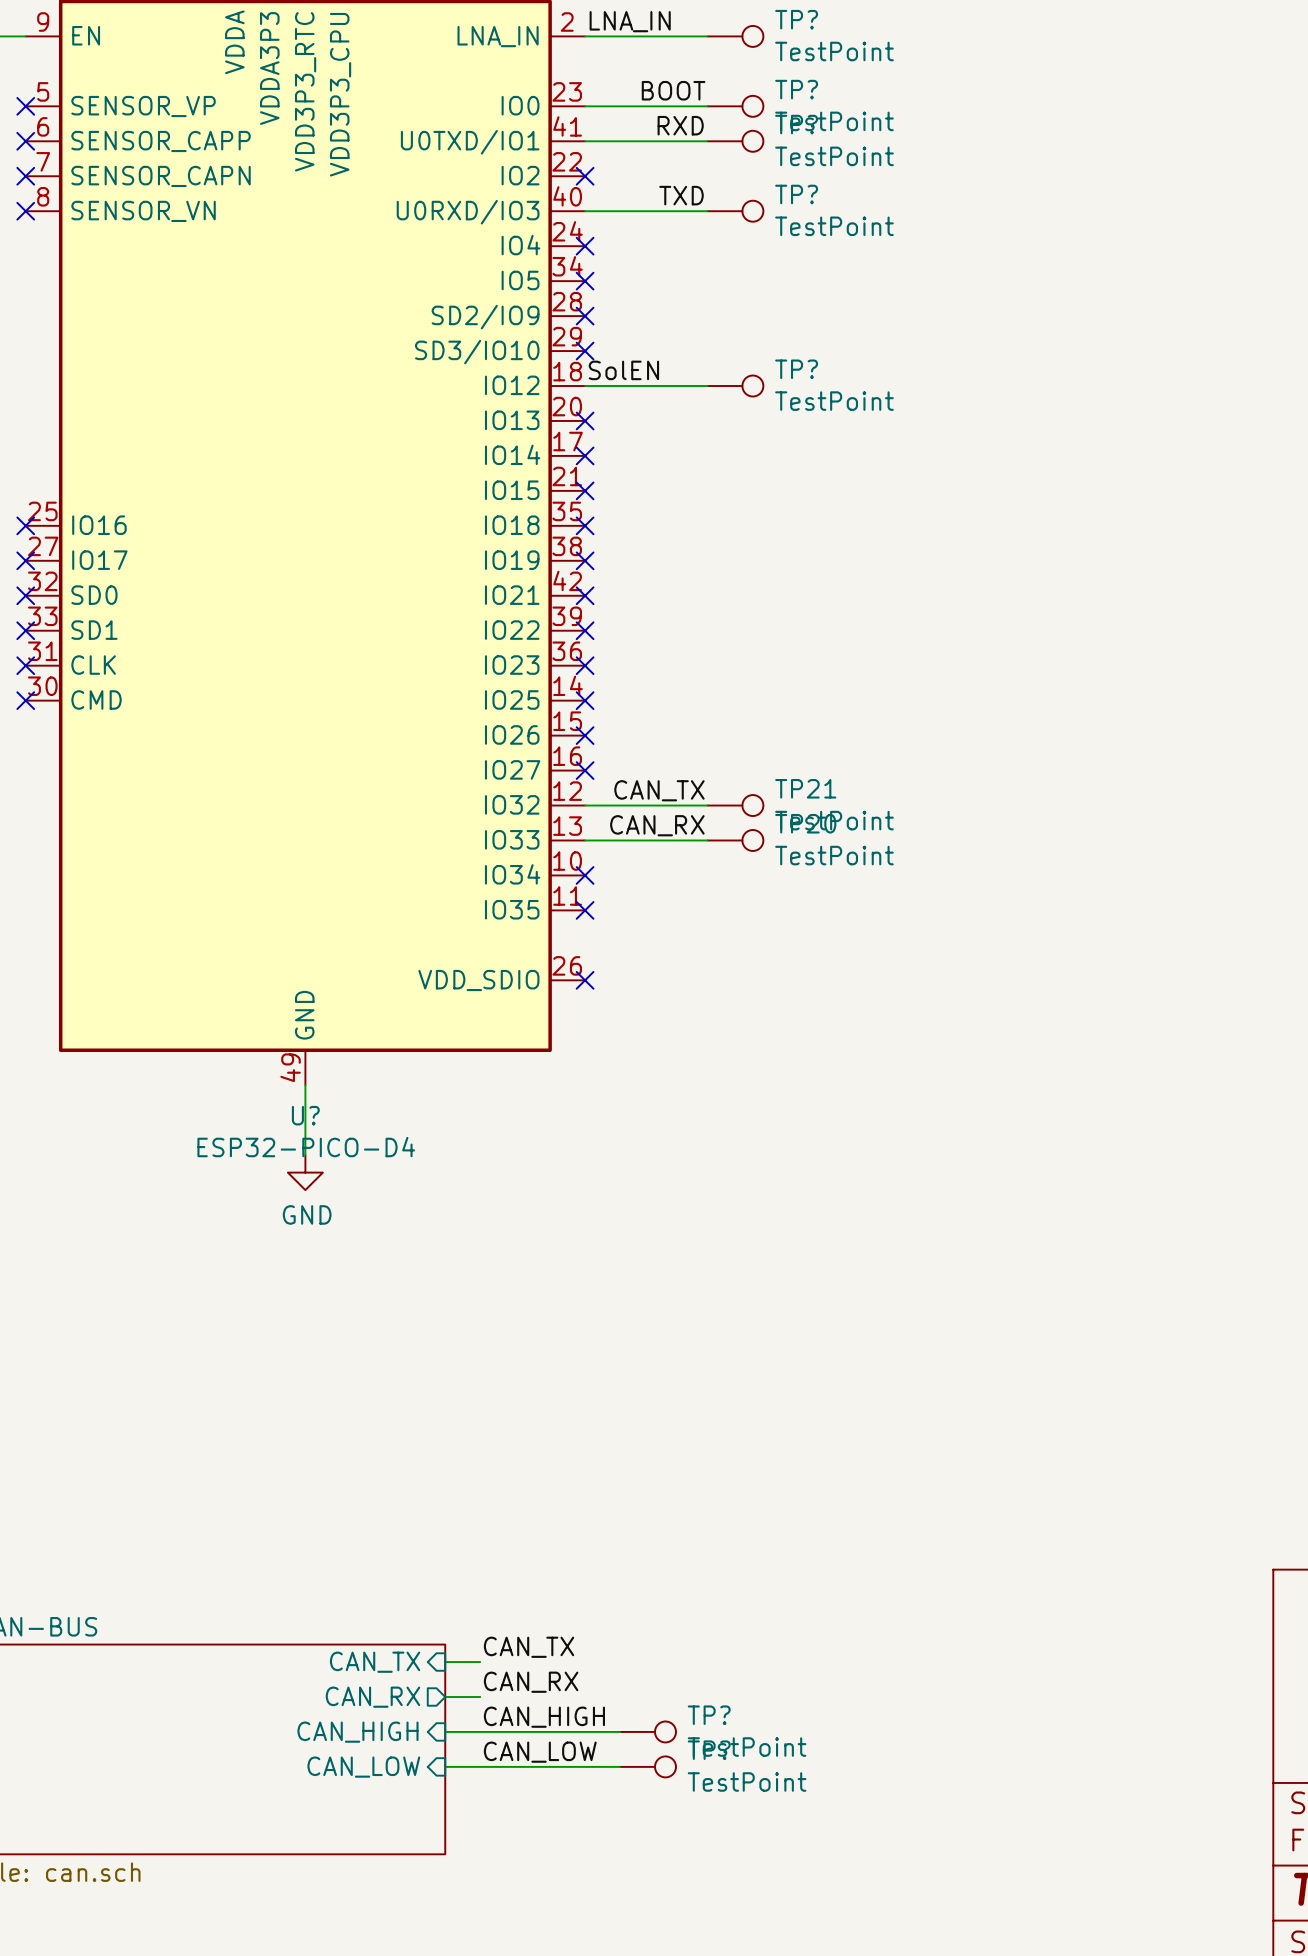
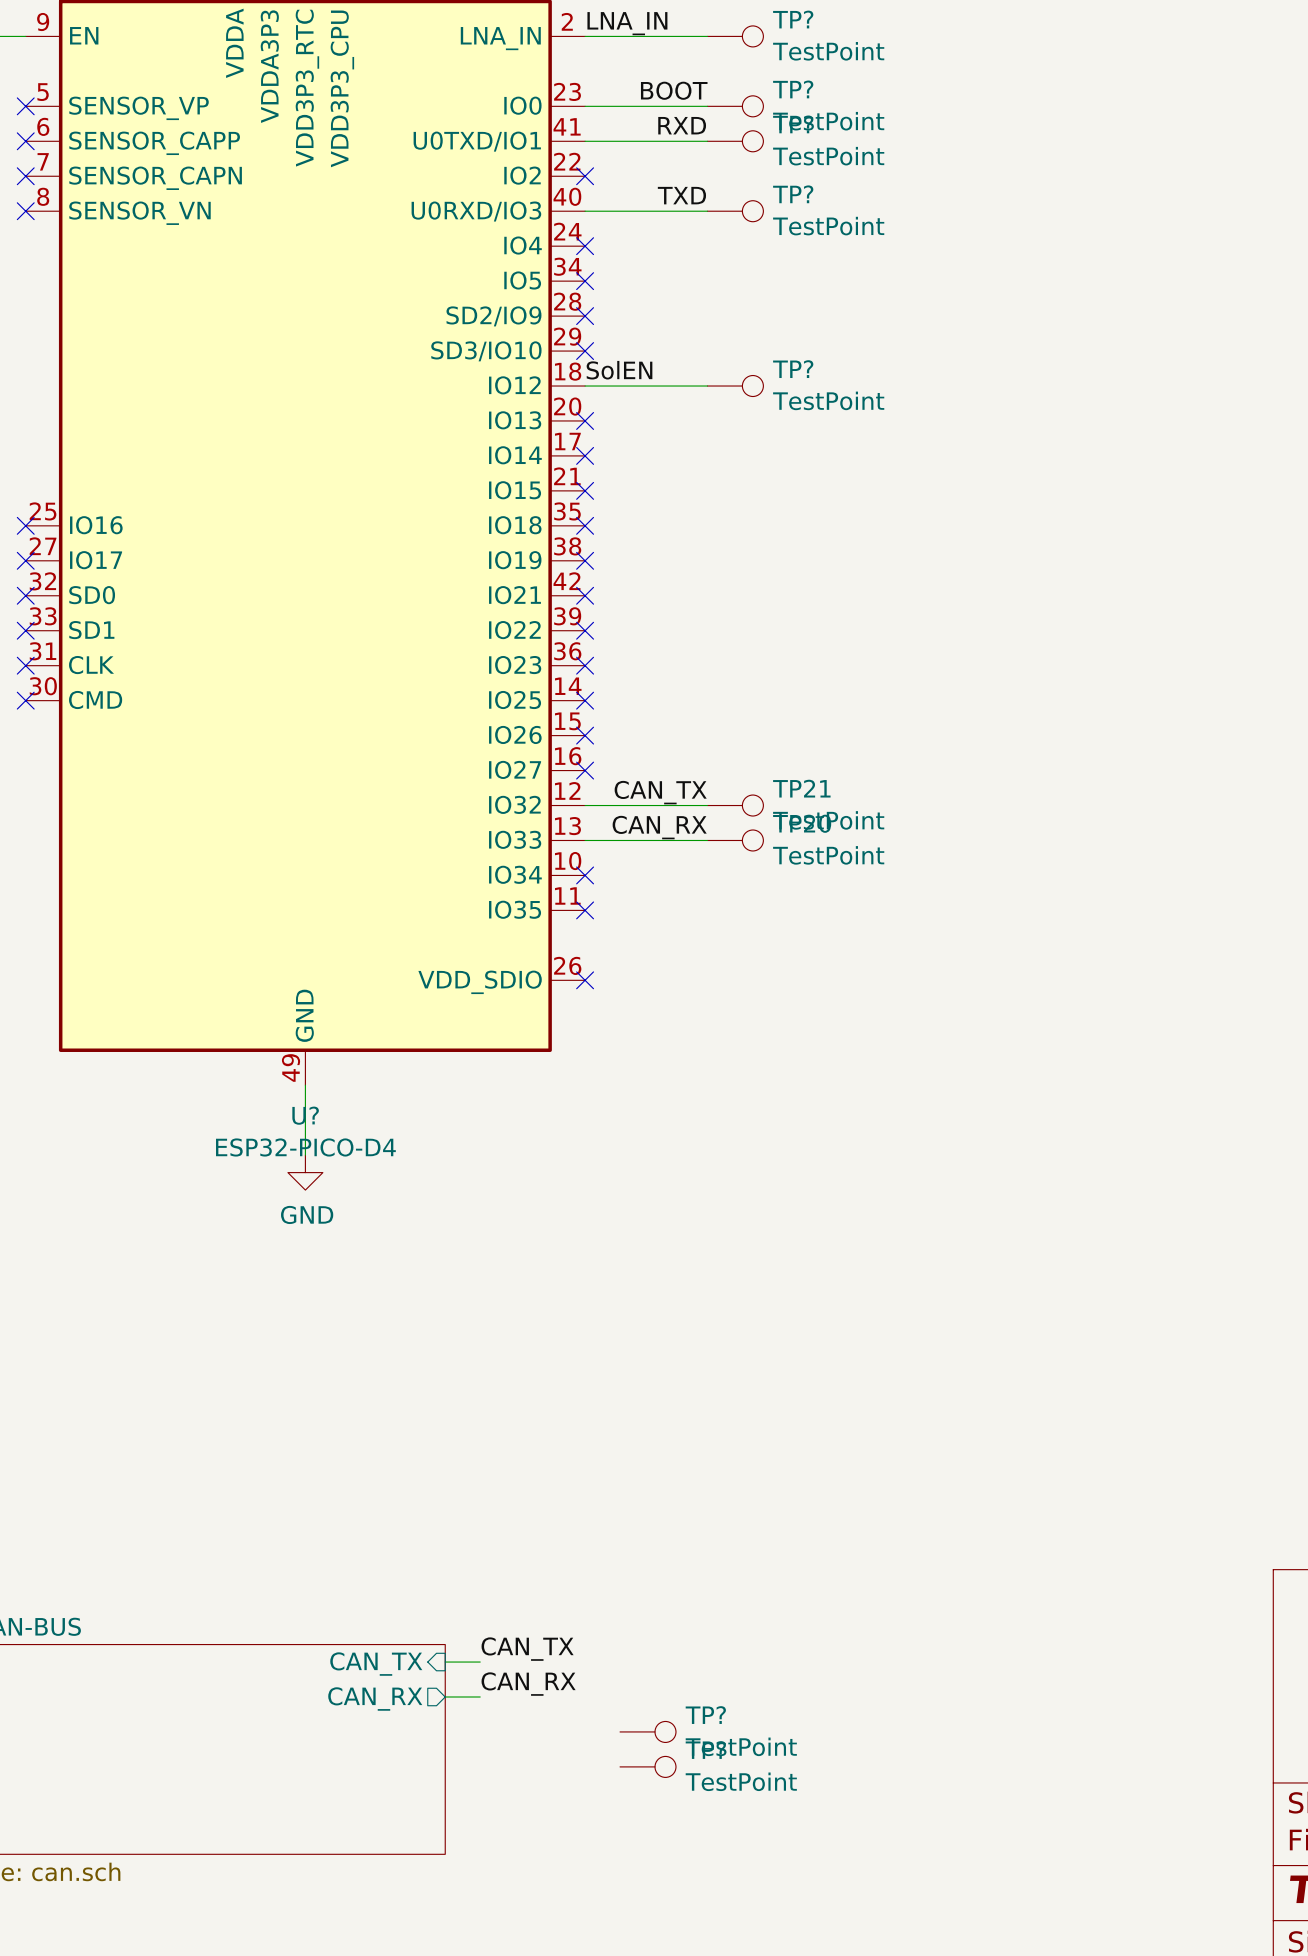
label: CAN_HIGH (544, 1717) -> none
wire: (445, 1731) (620, 1731) -> none
sheet pin: CAN_HIGH (357, 1732) -> none
label: CAN_LOW (540, 1752) -> none
wire: (445, 1766) (620, 1766) -> none
sheet pin: CAN_LOW (363, 1767) -> none

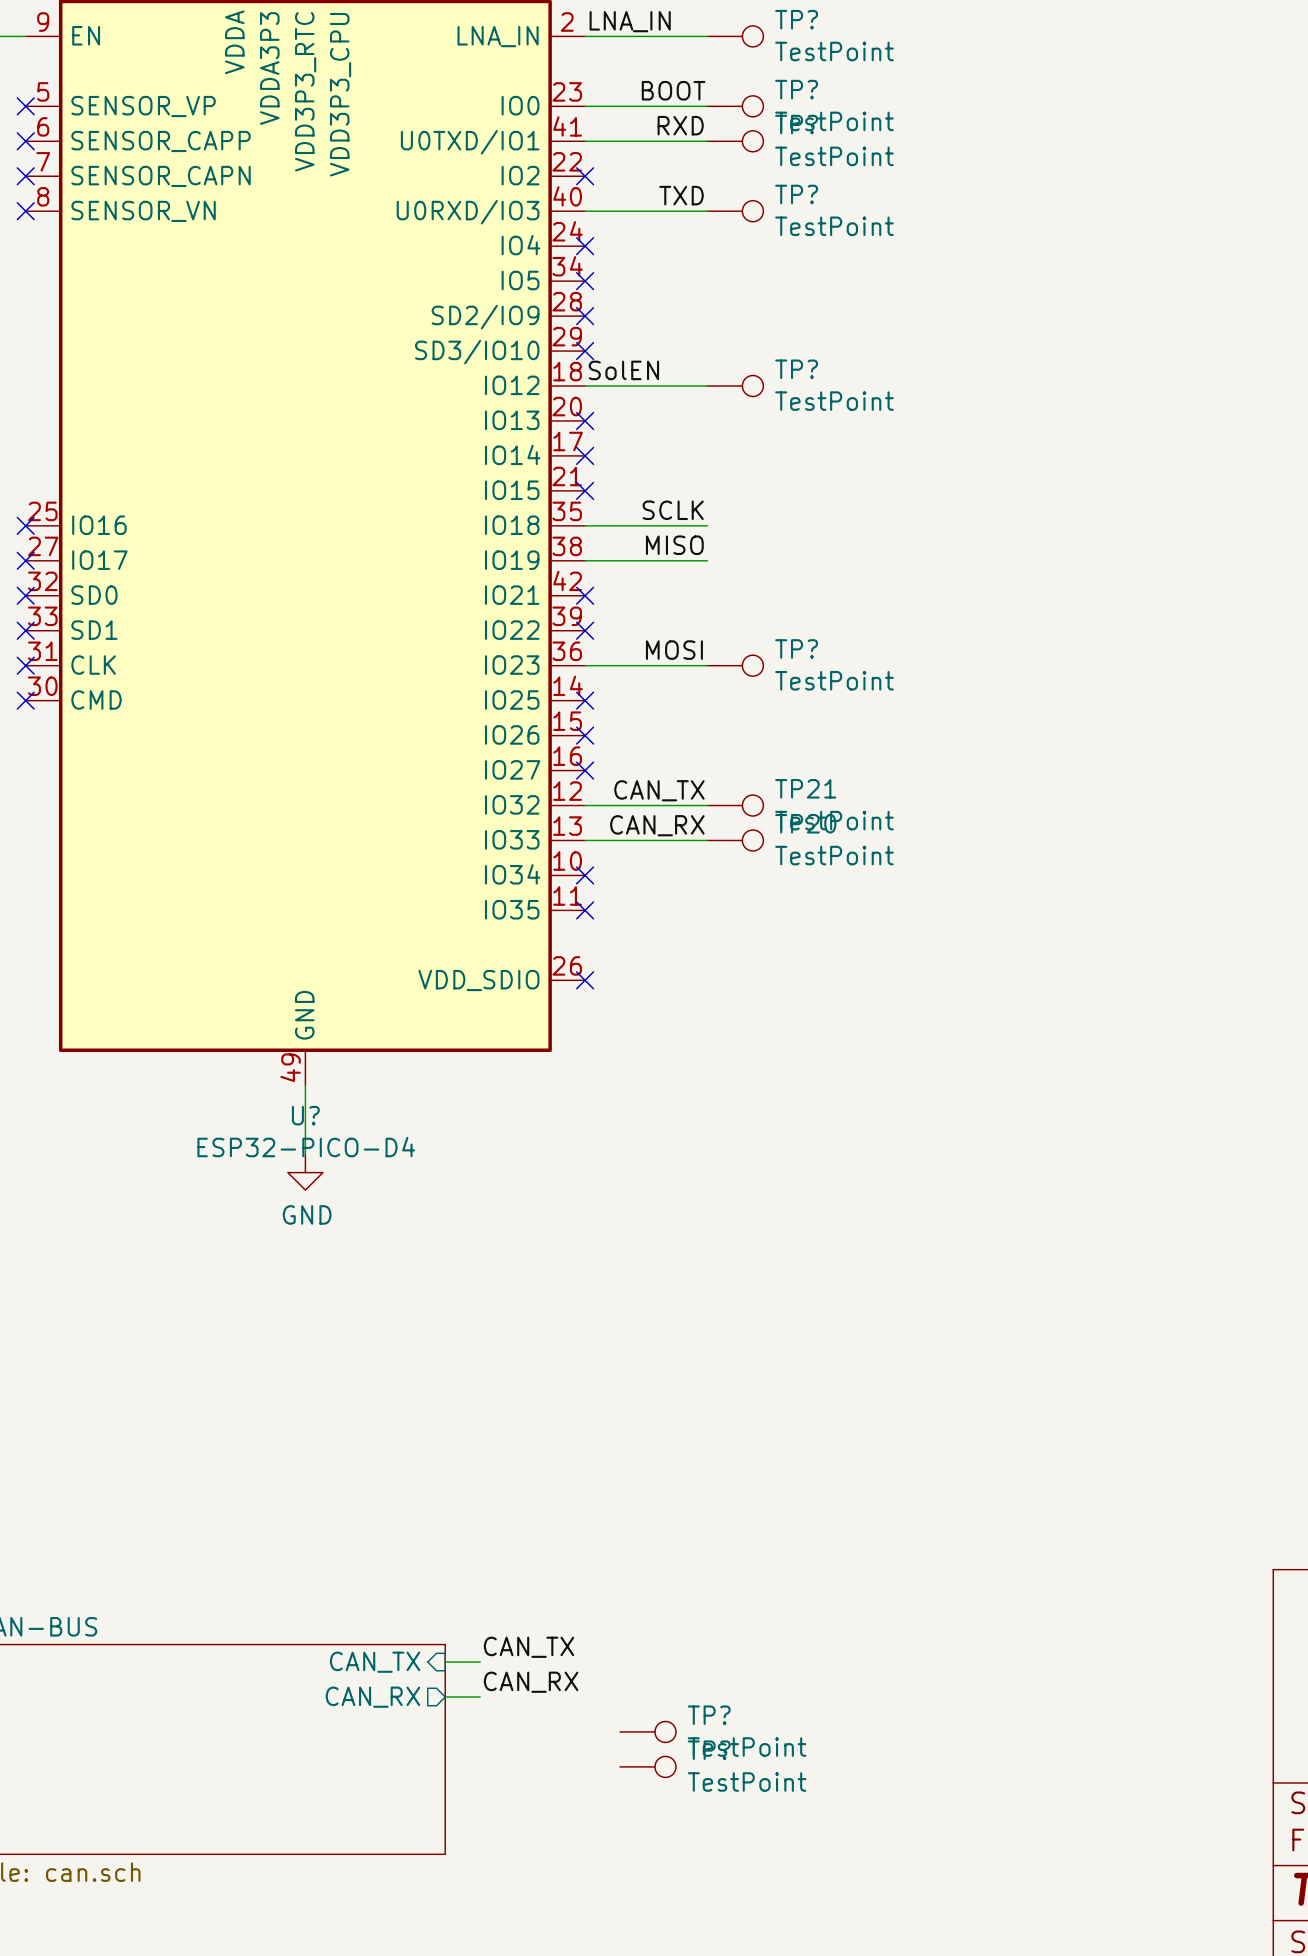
label: none -> SCLK (673, 510)
wire: none -> (585, 525) (707, 525)
no-connect mark: (585, 525) -> none
label: none -> MISO (674, 545)
wire: none -> (585, 560) (707, 560)
no-connect mark: (585, 560) -> none
label: none -> MOSI (674, 650)
wire: none -> (585, 665) (707, 665)
no-connect mark: (585, 665) -> none
TP?: none -> TestPoint (735, 665)

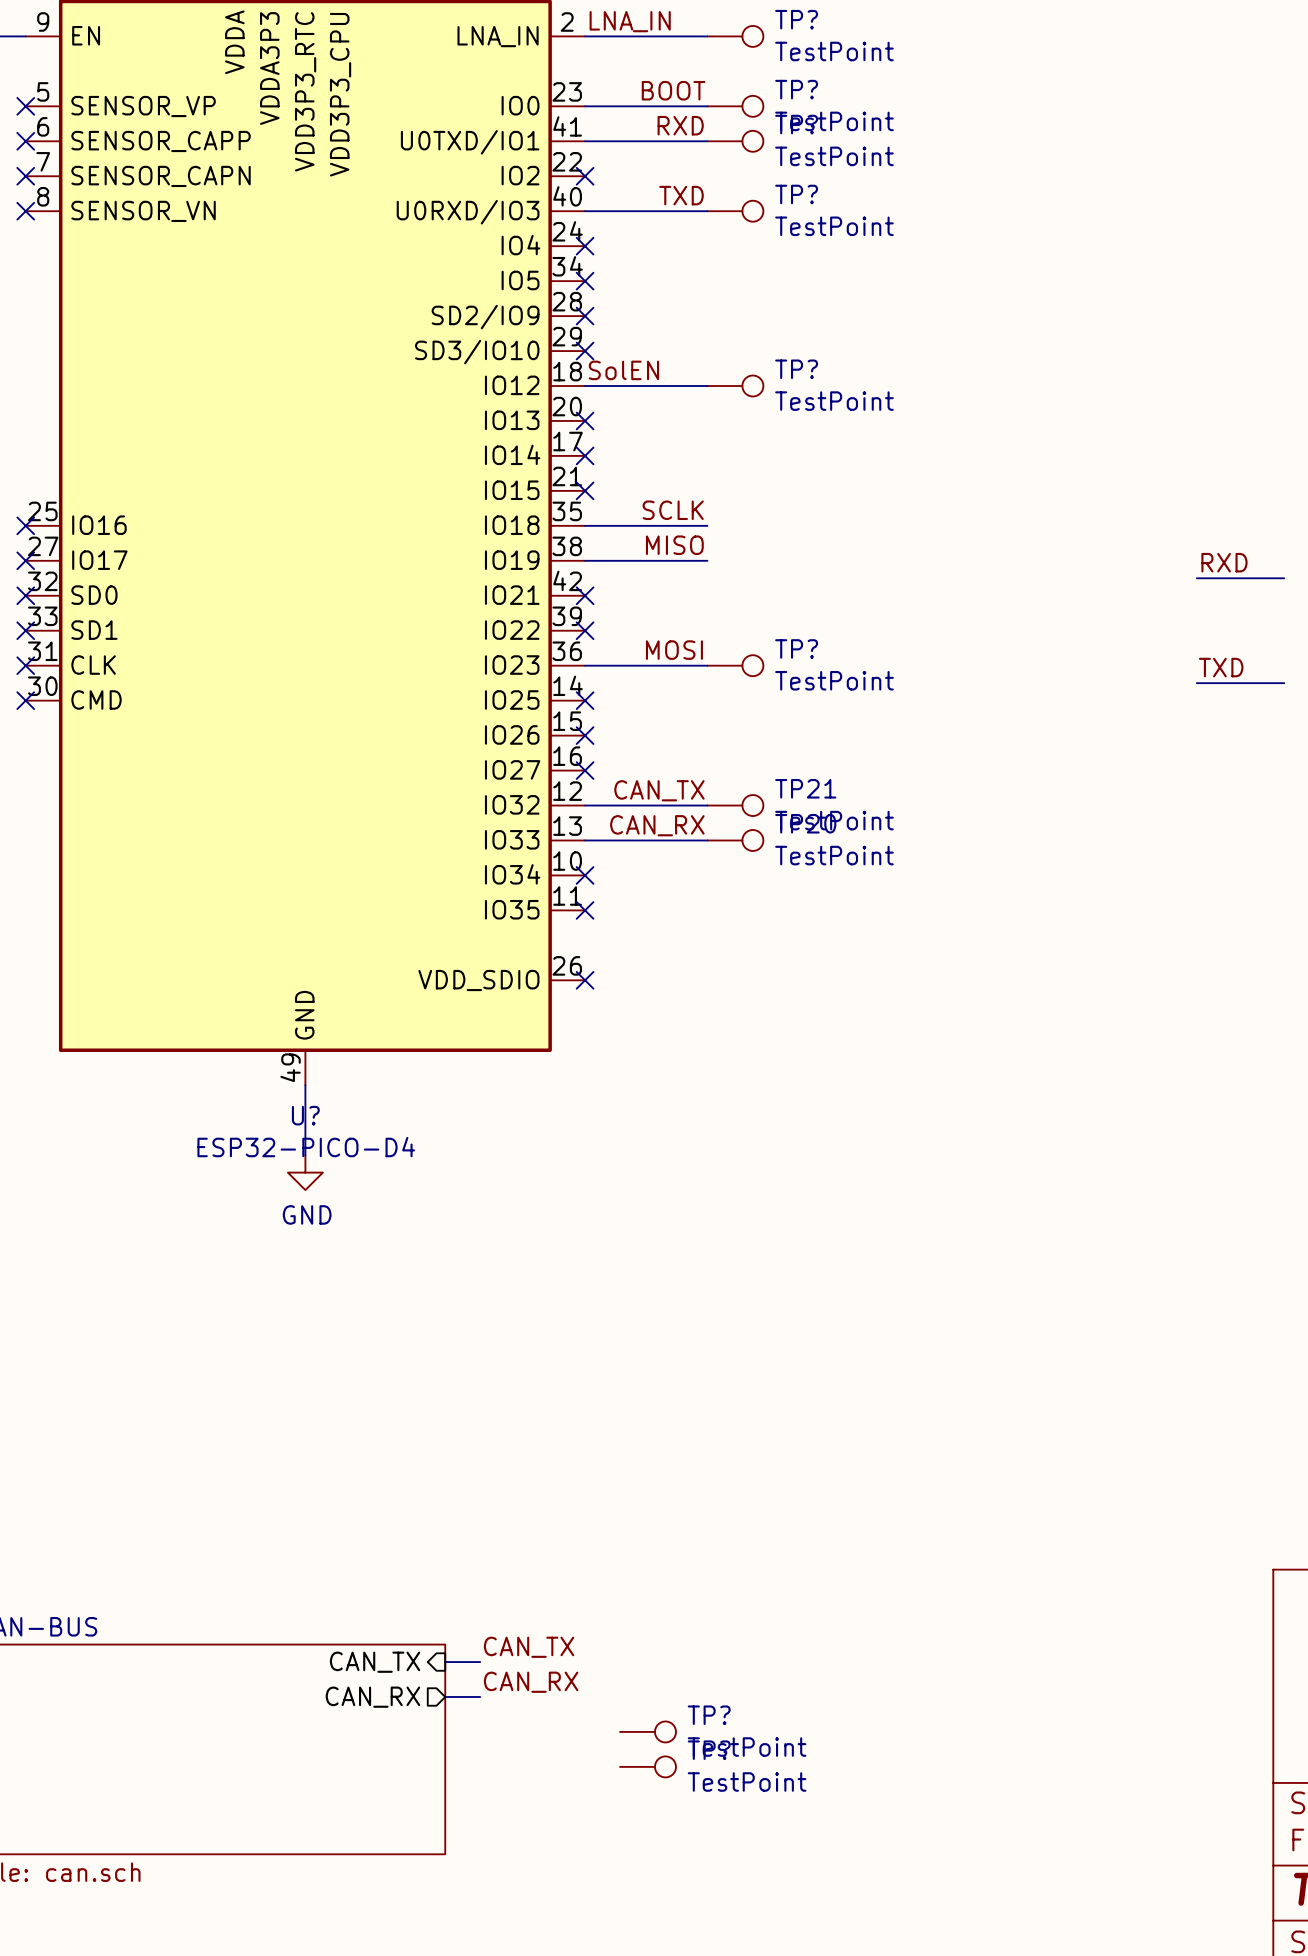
label: none -> RXD (1224, 562)
wire: none -> (1196, 578) (1284, 578)
label: none -> TXD (1221, 667)
wire: none -> (1196, 683) (1284, 683)

